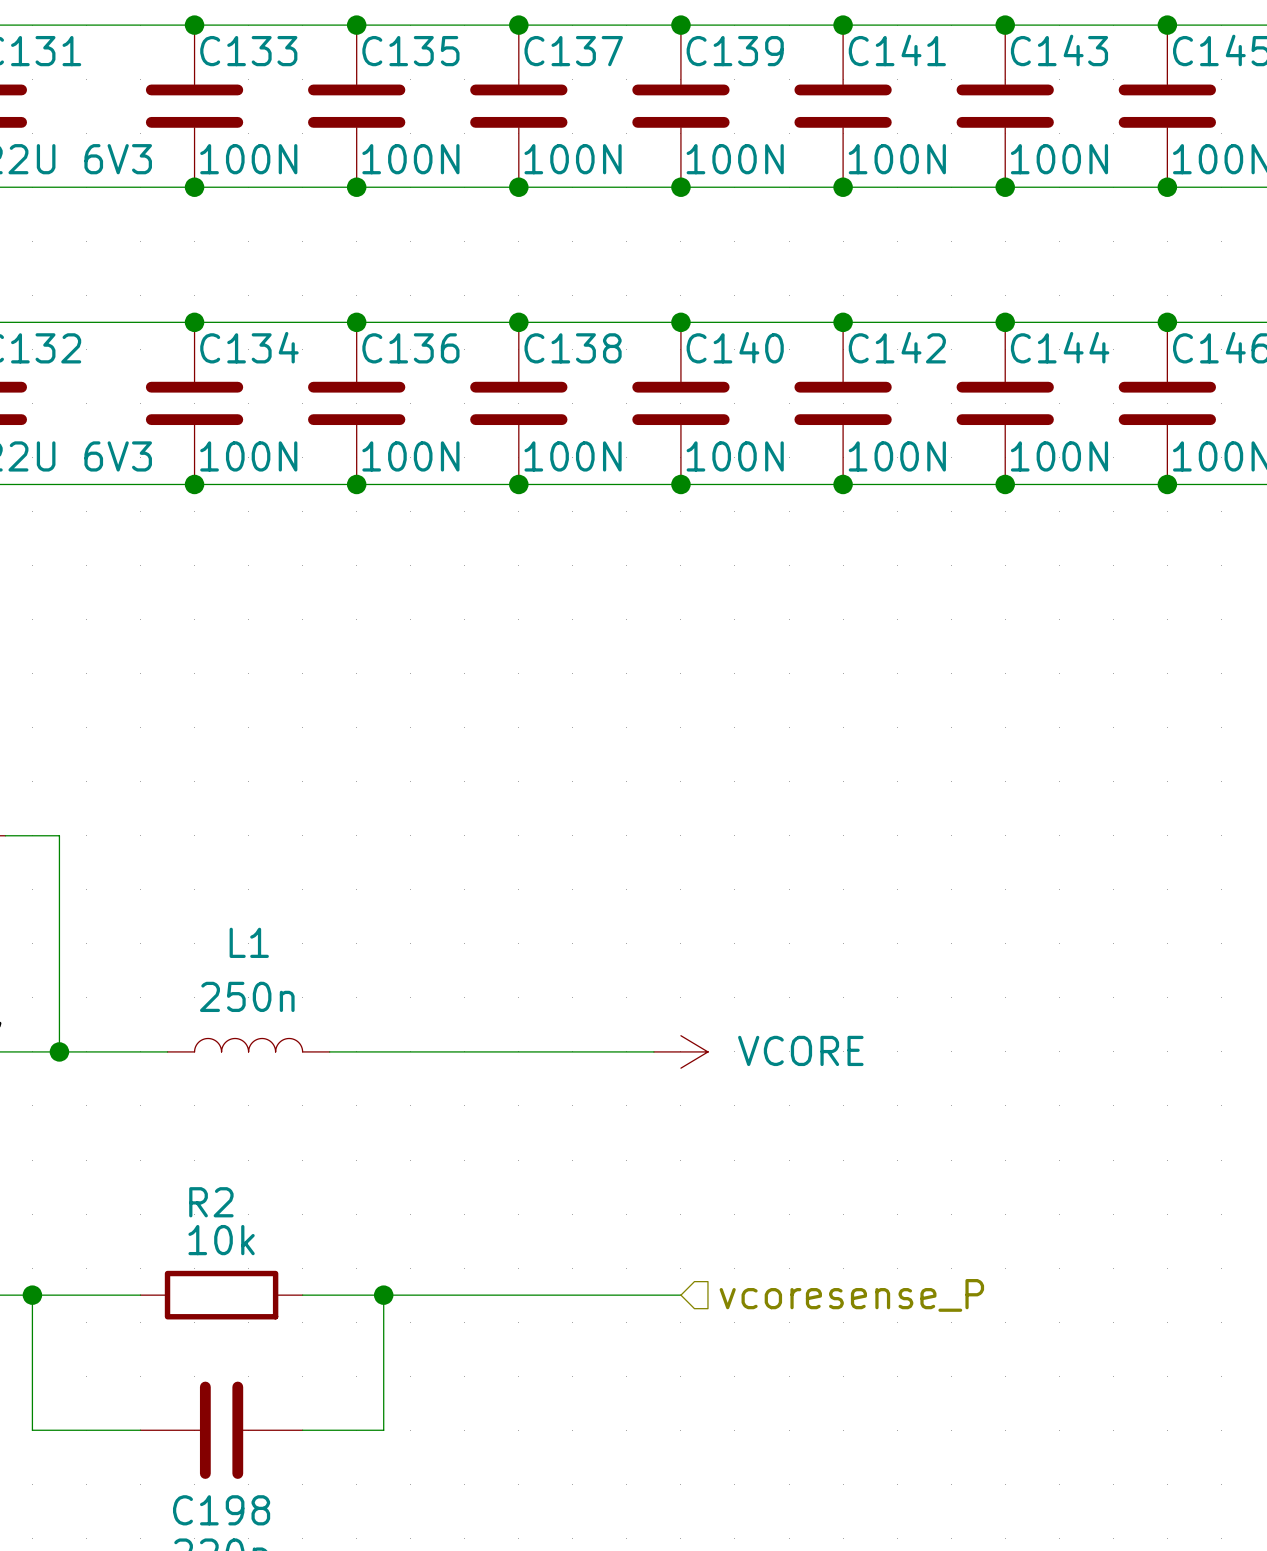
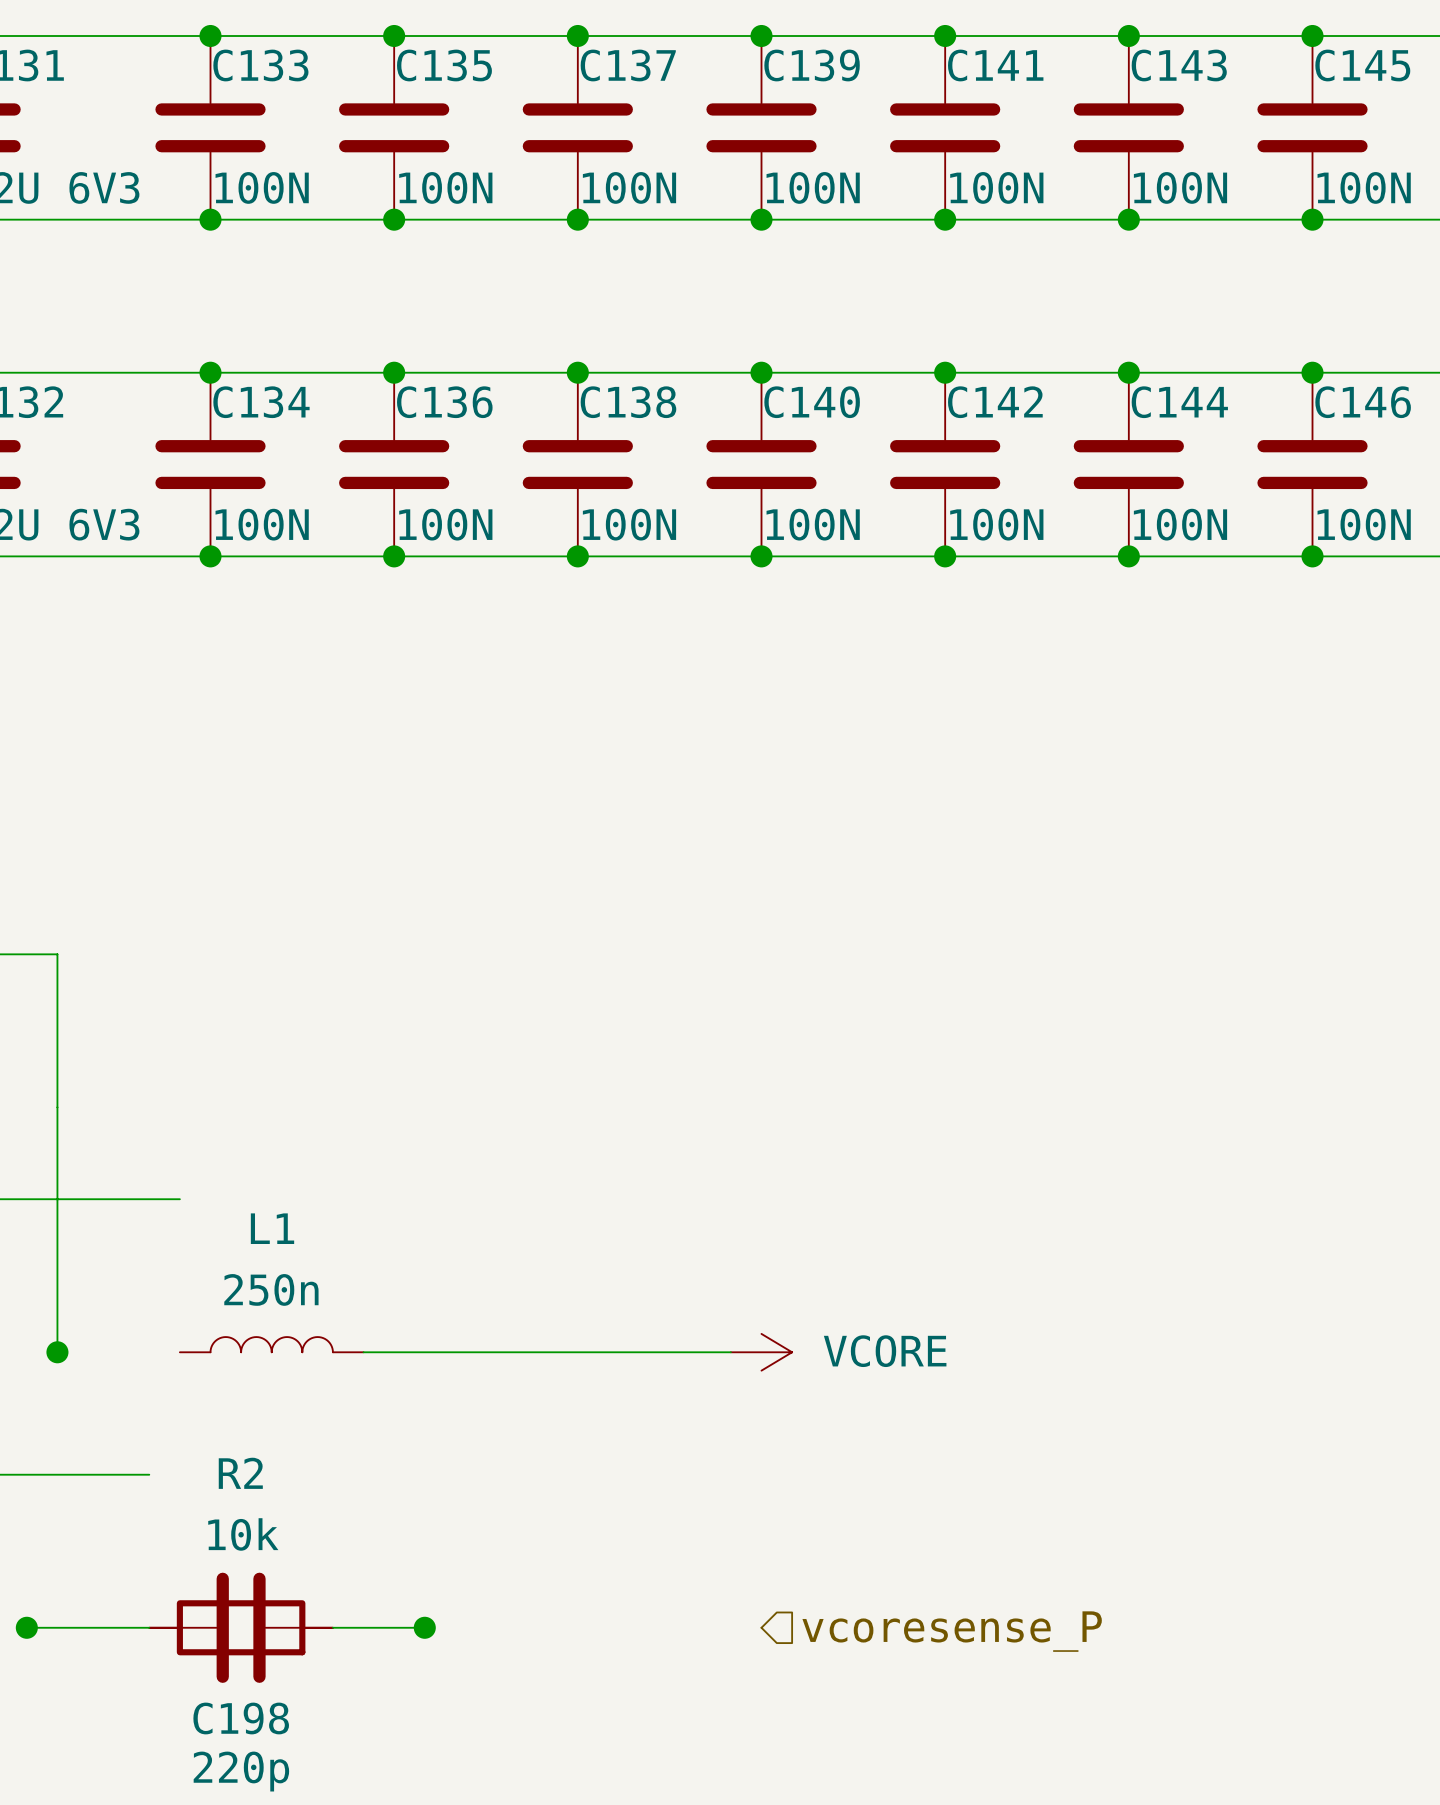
L1 position: (248, 1045) -> (271, 1344)
junction: (59, 1051) -> none
wire: (329, 1051) (653, 1051) -> (363, 1352) (730, 1352)
power symbol position: VCORE (680, 1051) -> VCORE (761, 1352)
junction: none -> (57, 1352)
R2 name position: R2 (211, 1202) -> R2 (240, 1473)
R2 value position: 10k (221, 1240) -> 10k (243, 1534)
wire: (32, 1295) (32, 1430) -> (57, 1199) (57, 1352)
junction: (32, 1295) -> none
R2 position: (221, 1295) -> (241, 1627)
wire: (302, 1295) (680, 1295) -> none
wire: (383, 1295) (383, 1430) -> none
junction: (383, 1295) -> none
hierarchical label position: vcoresense_P (851, 1295) -> vcoresense_P (952, 1631)
junction: none -> (26, 1627)
junction: none -> (424, 1627)

